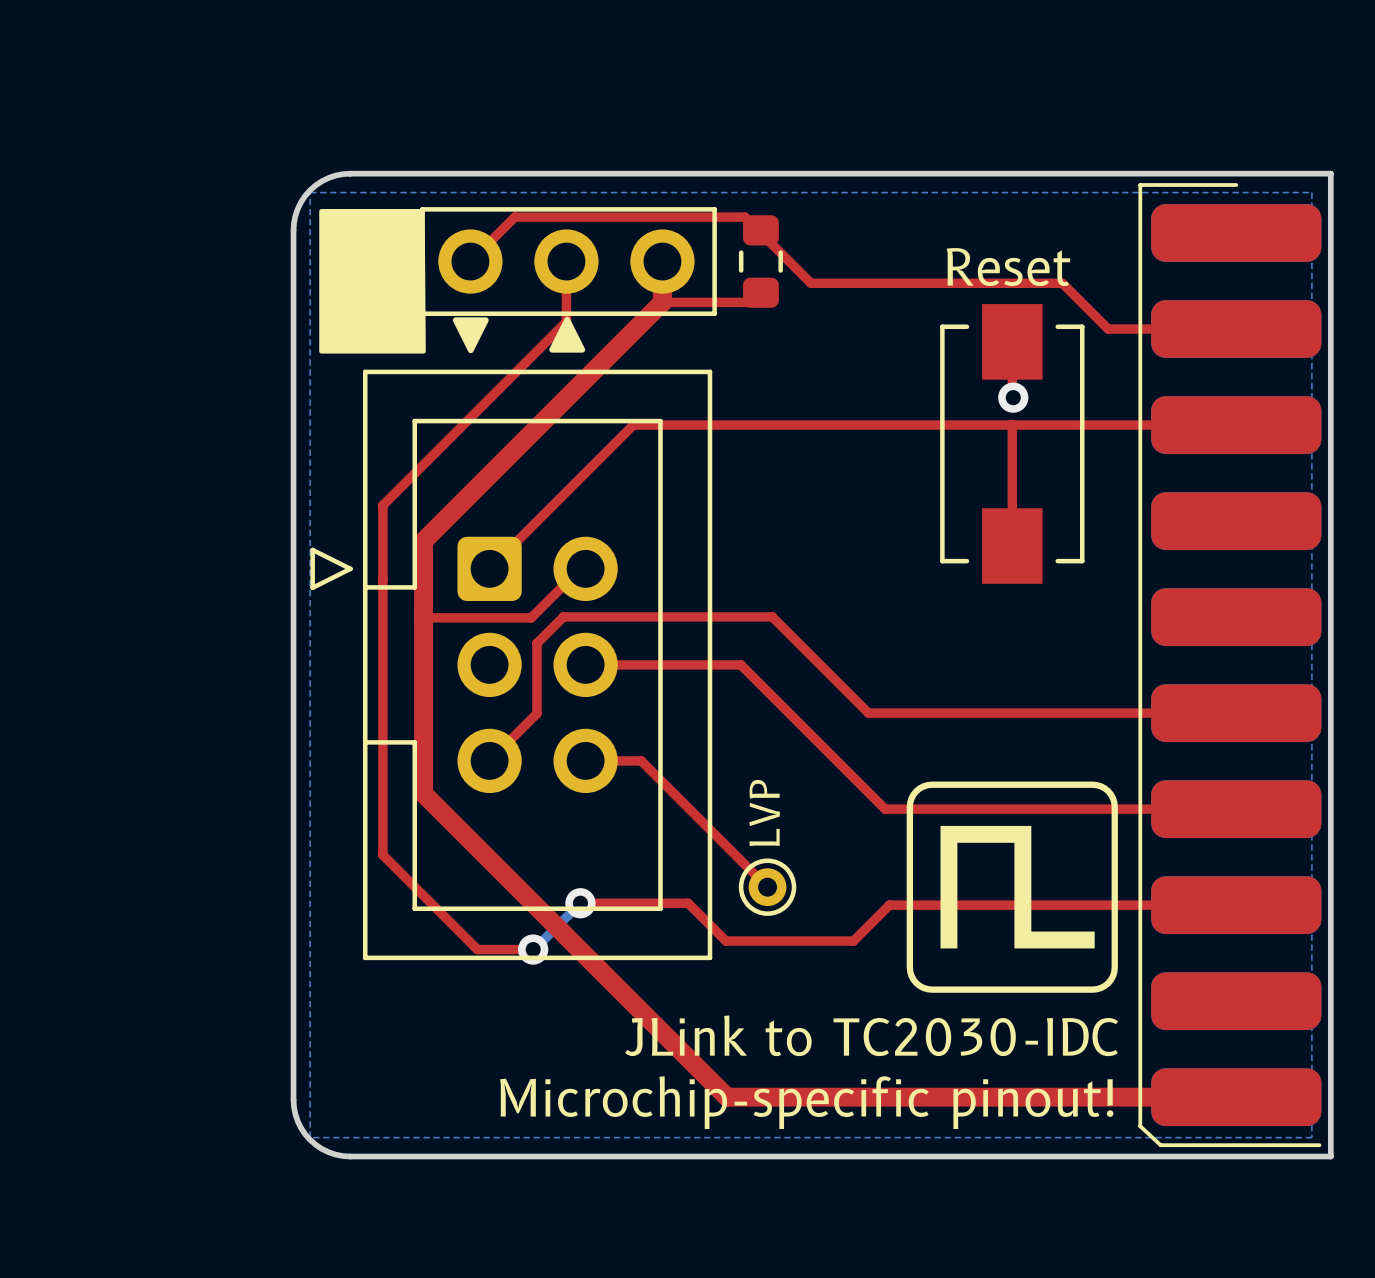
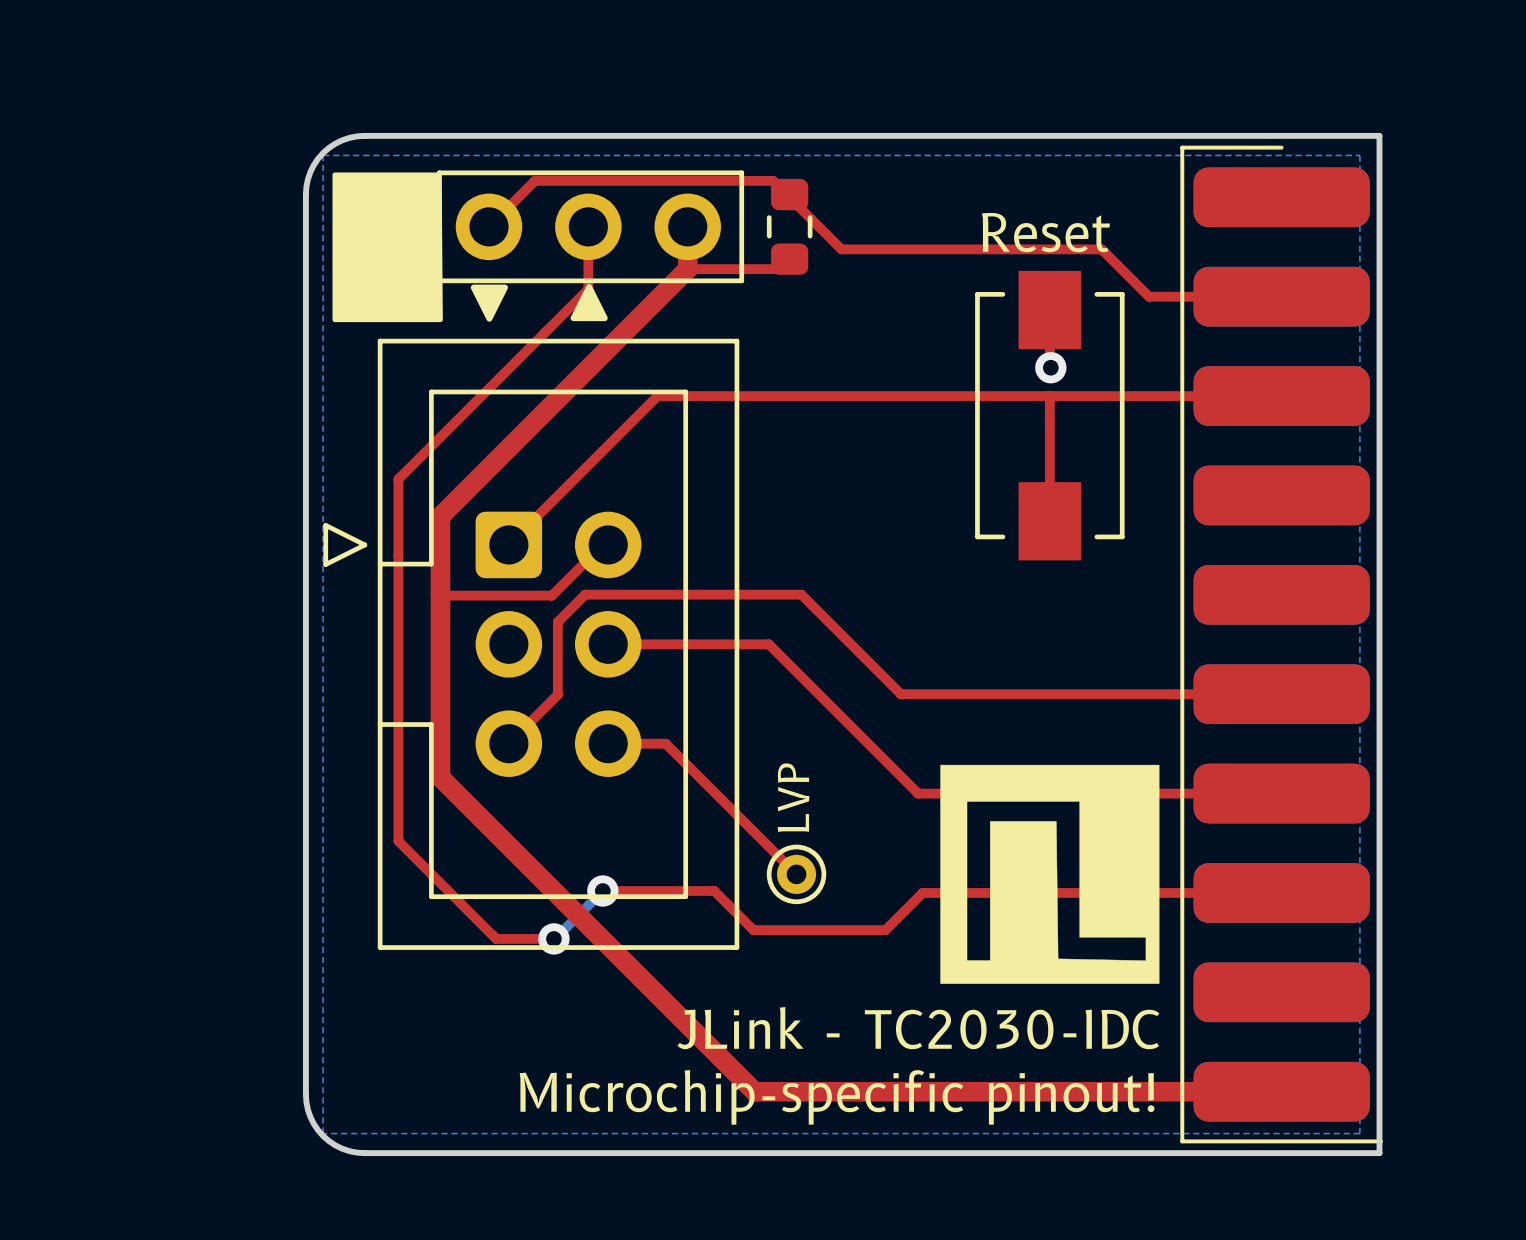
part footprint: [1138, 183, 1322, 1148] -> [1180, 145, 1384, 1144]
drawing shape: [906, 781, 1118, 993] -> [940, 764, 1160, 984]
text: JLink to TC2030-IDC (871, 1035) -> JLink - TC2030-IDC (918, 1028)

